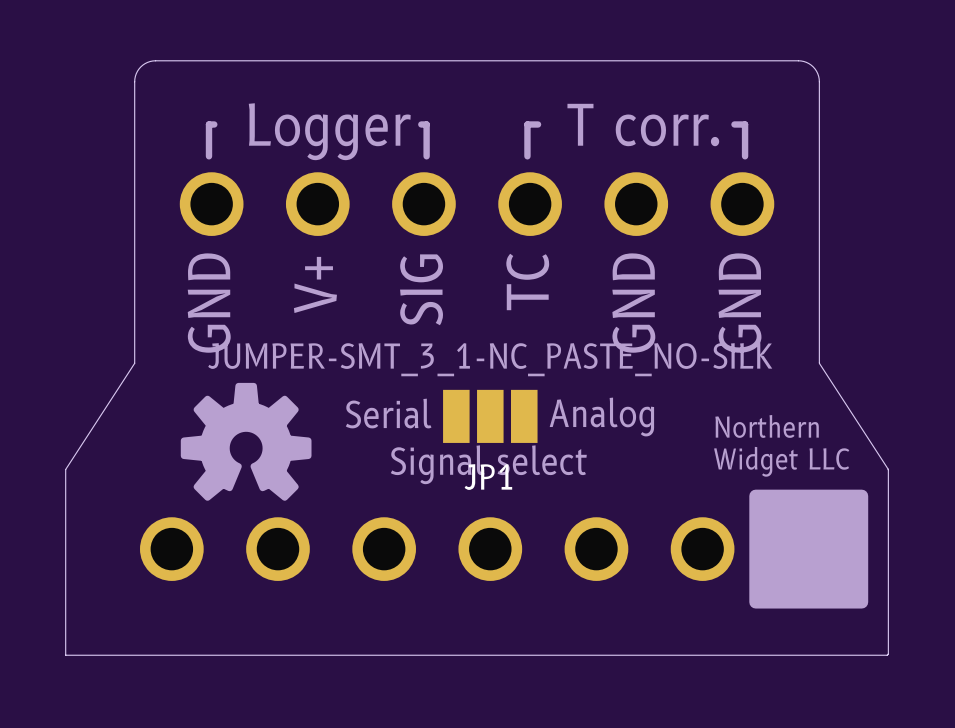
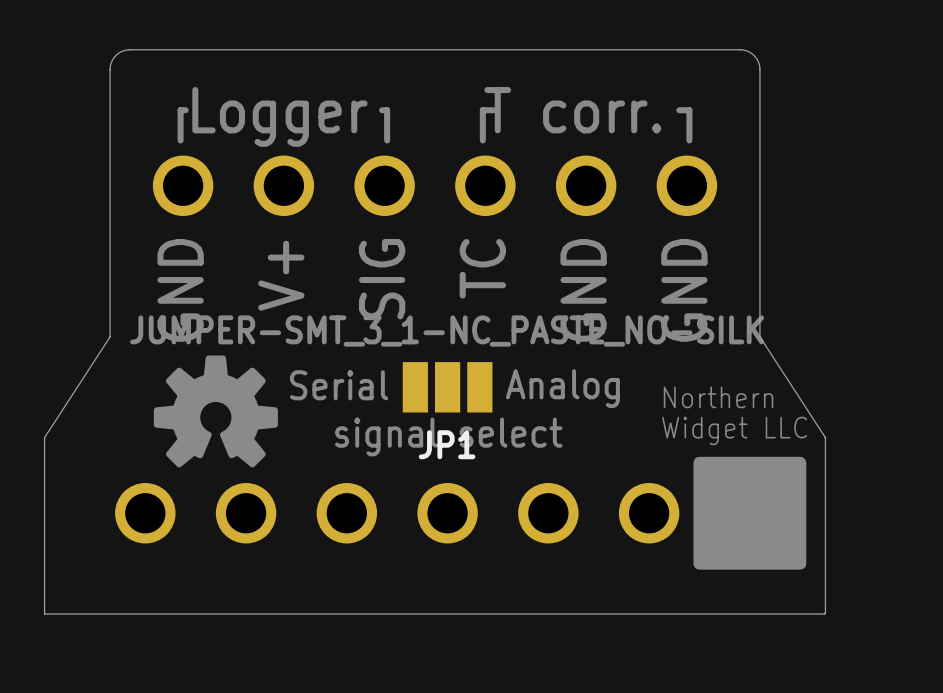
text: Signal select (488, 464) -> signal select (448, 437)

